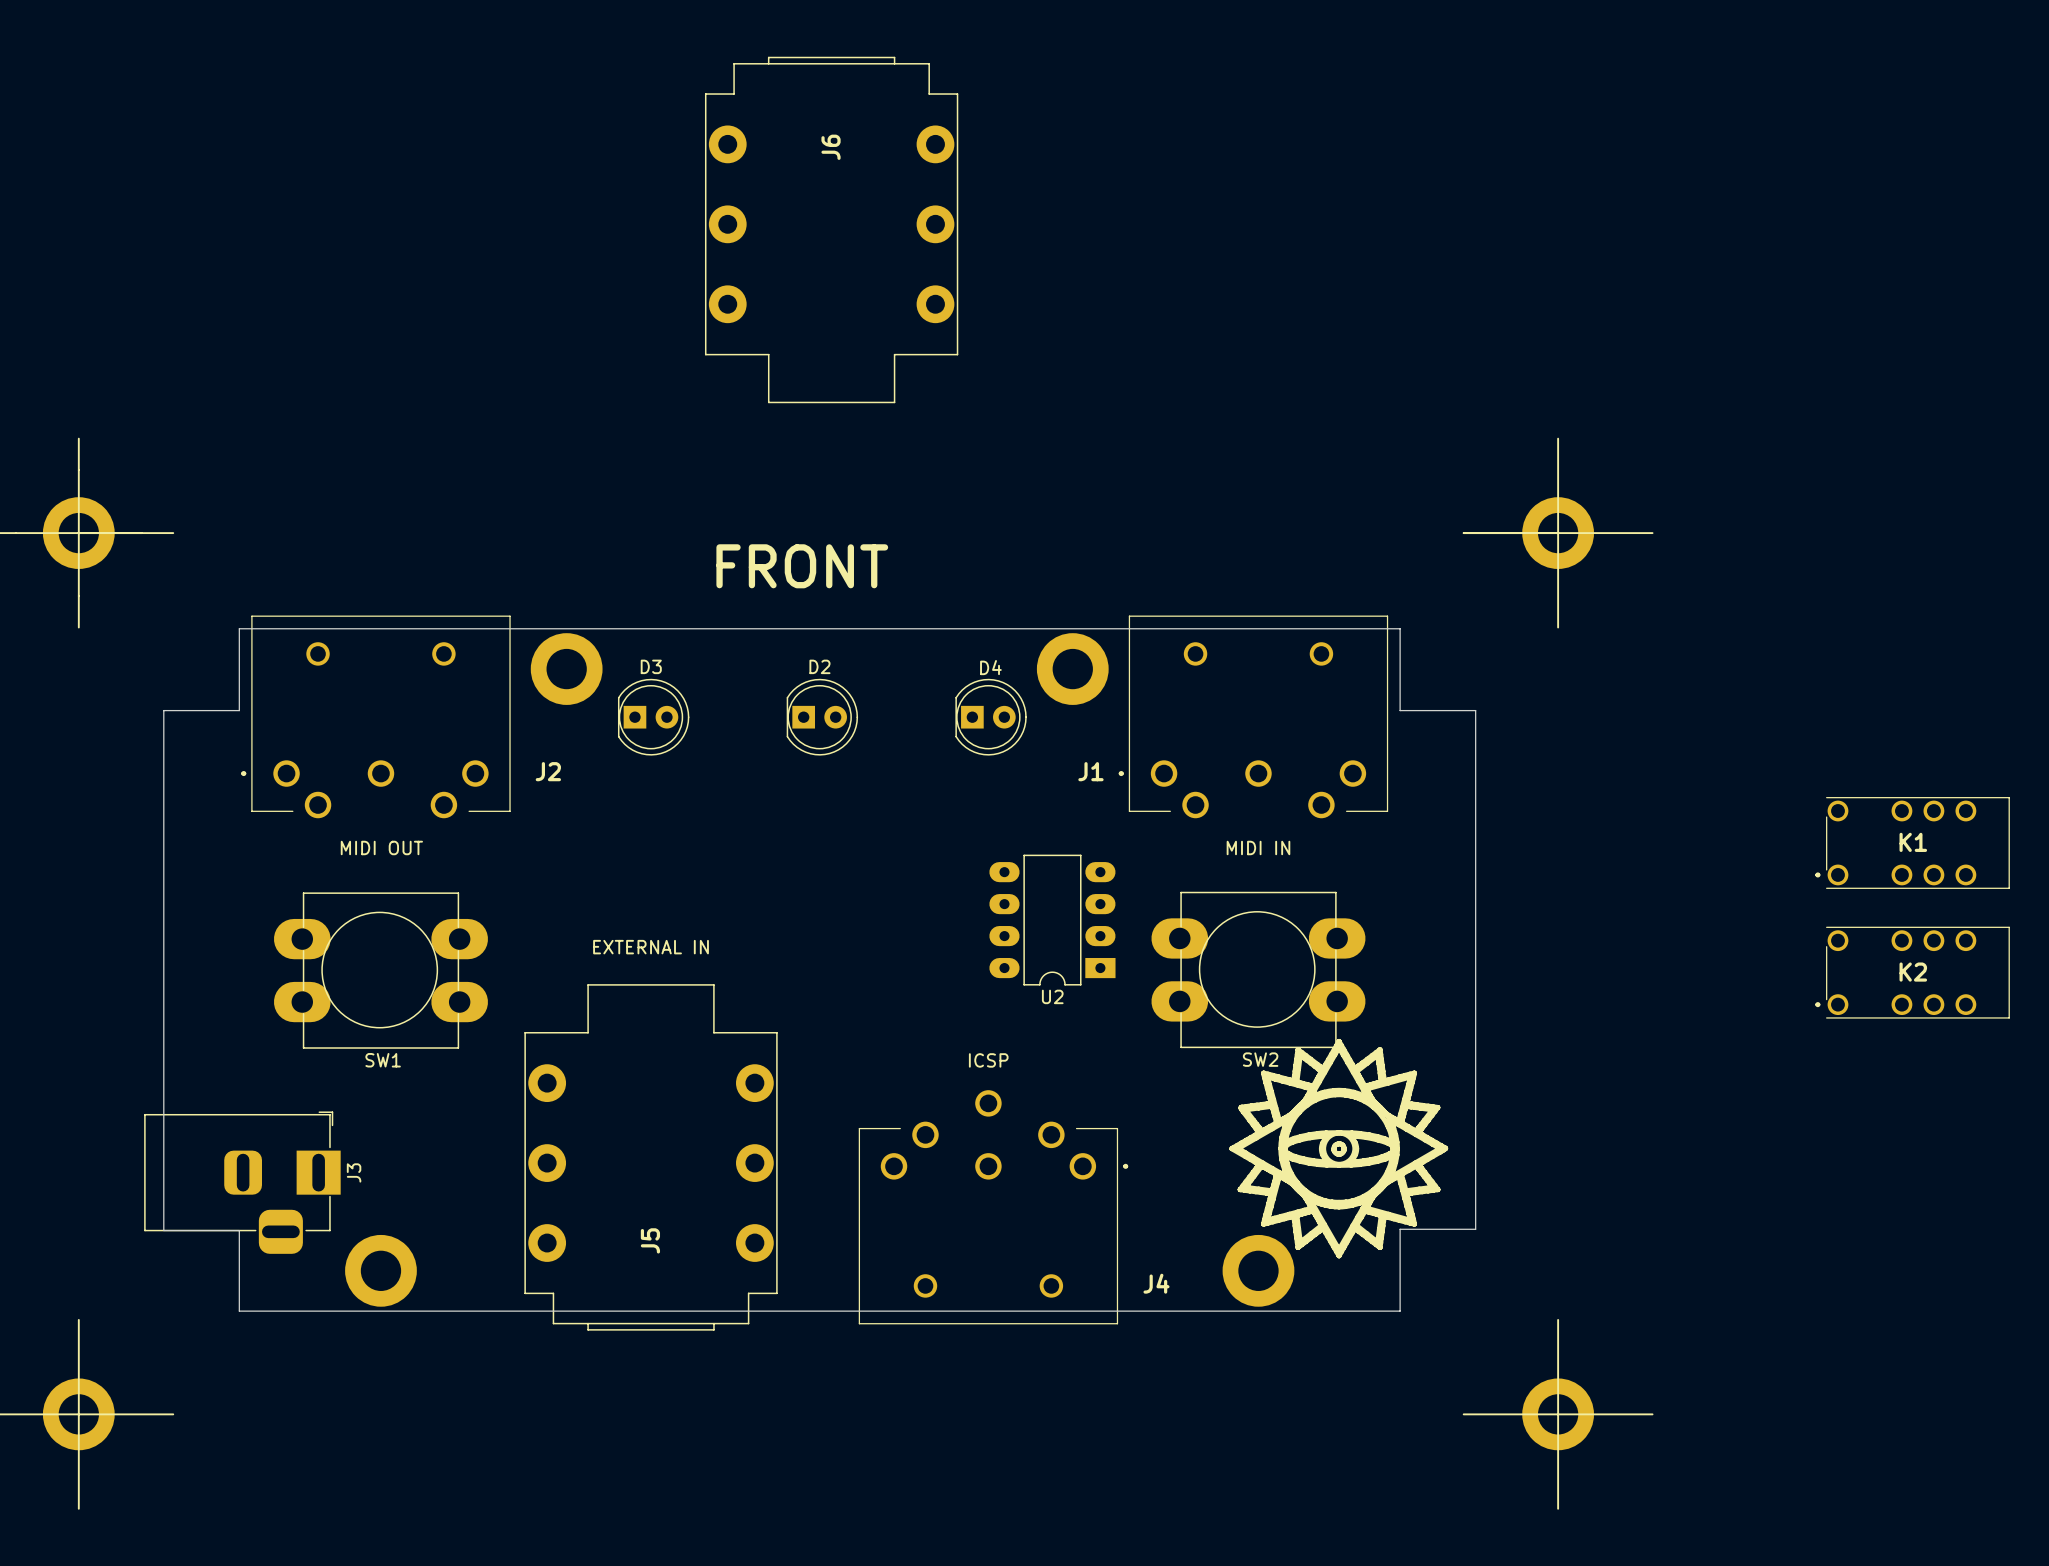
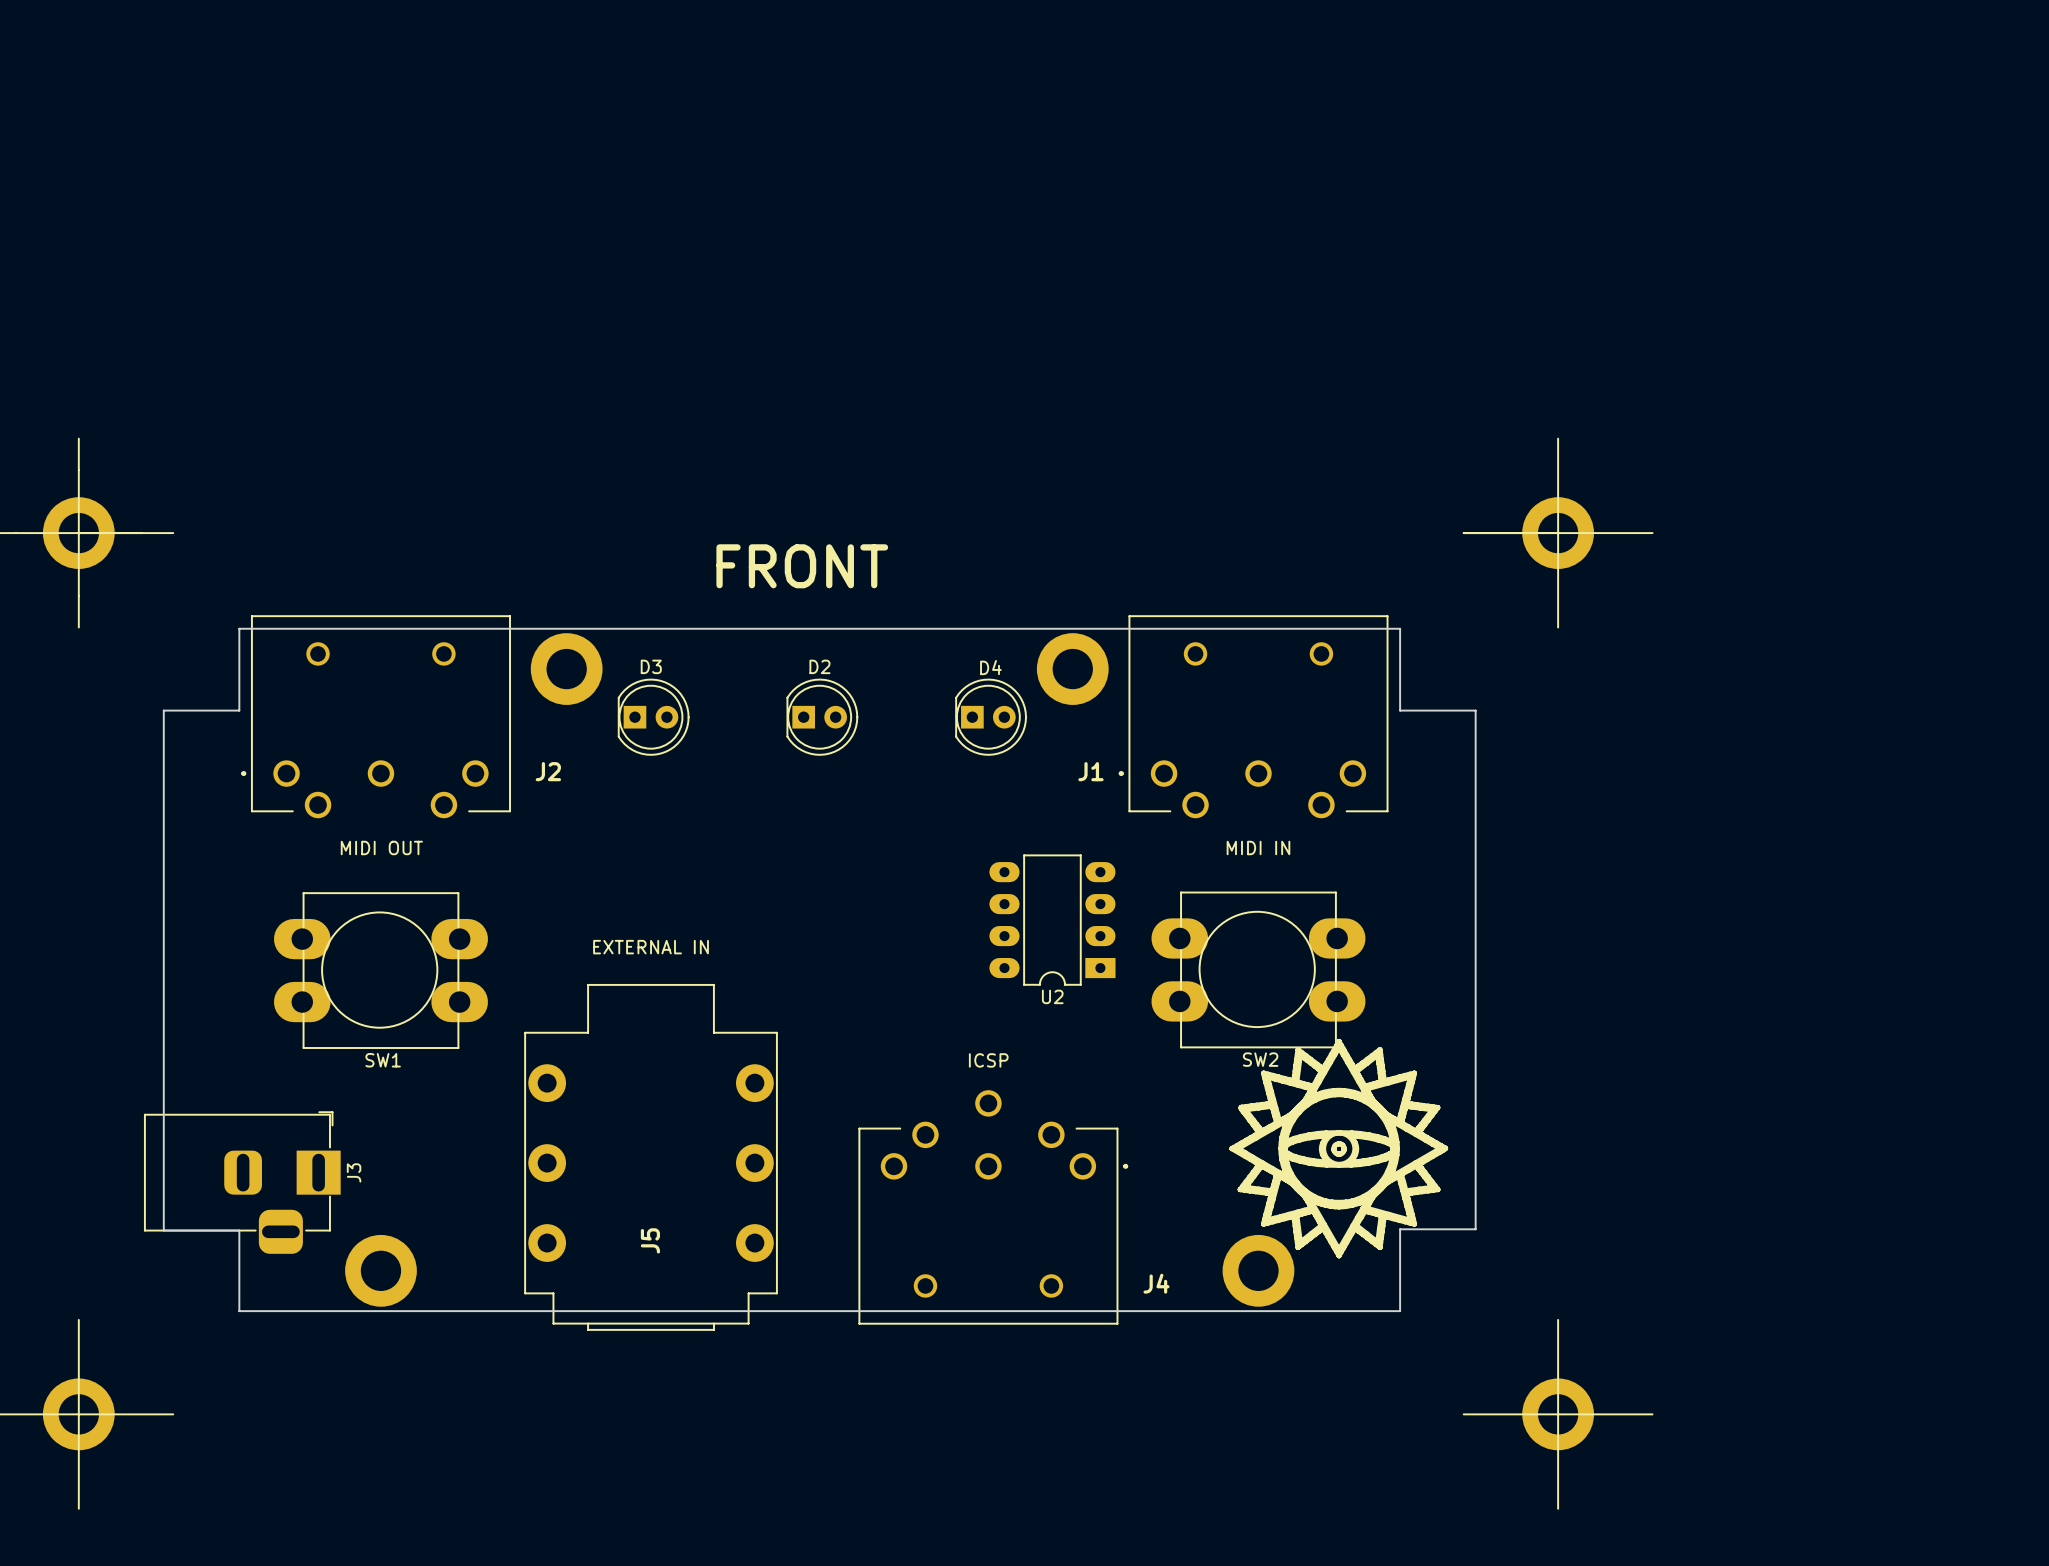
J6: (831, 229) -> none
K1: (1912, 842) -> none
K2: (1912, 972) -> none

